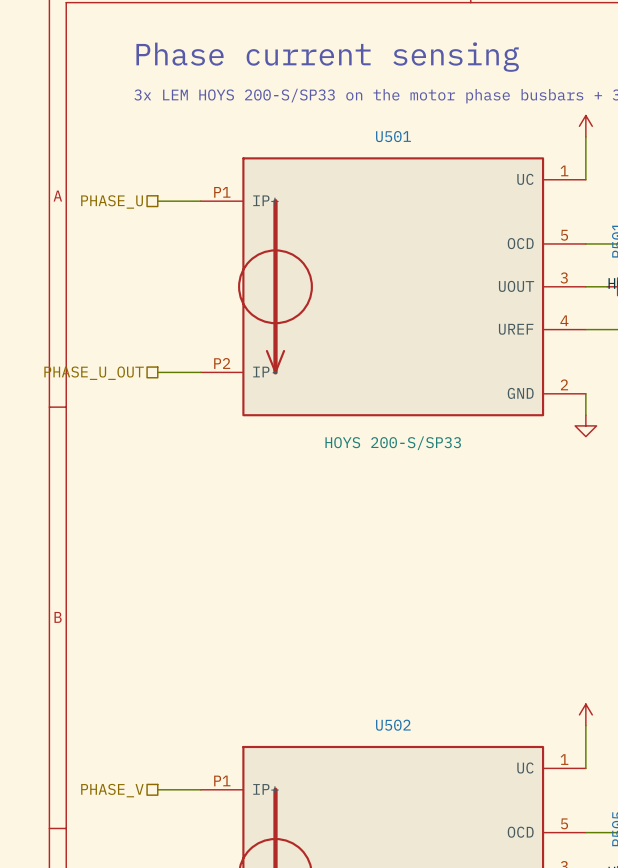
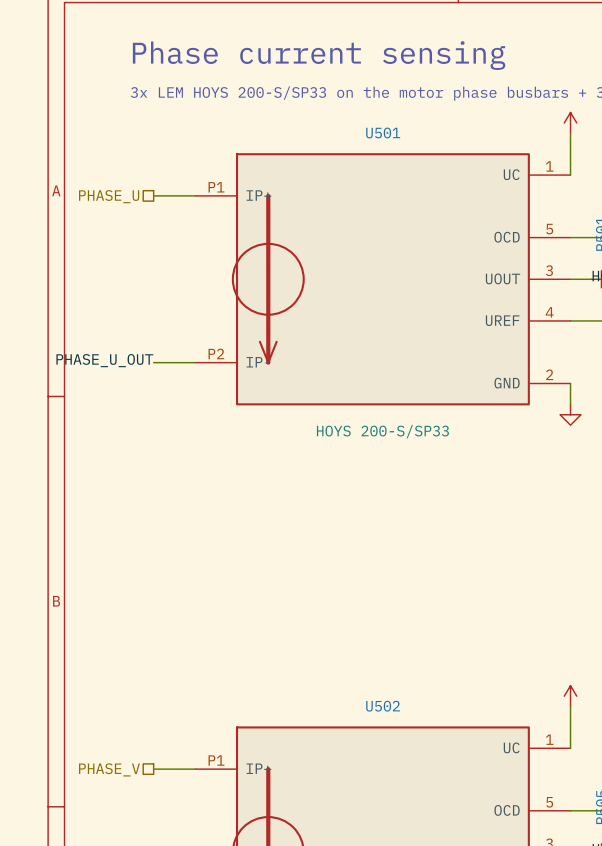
label: none -> PHASE_U_OUT (104, 360)
hierarchical label: PHASE_U_OUT (94, 373) -> none

